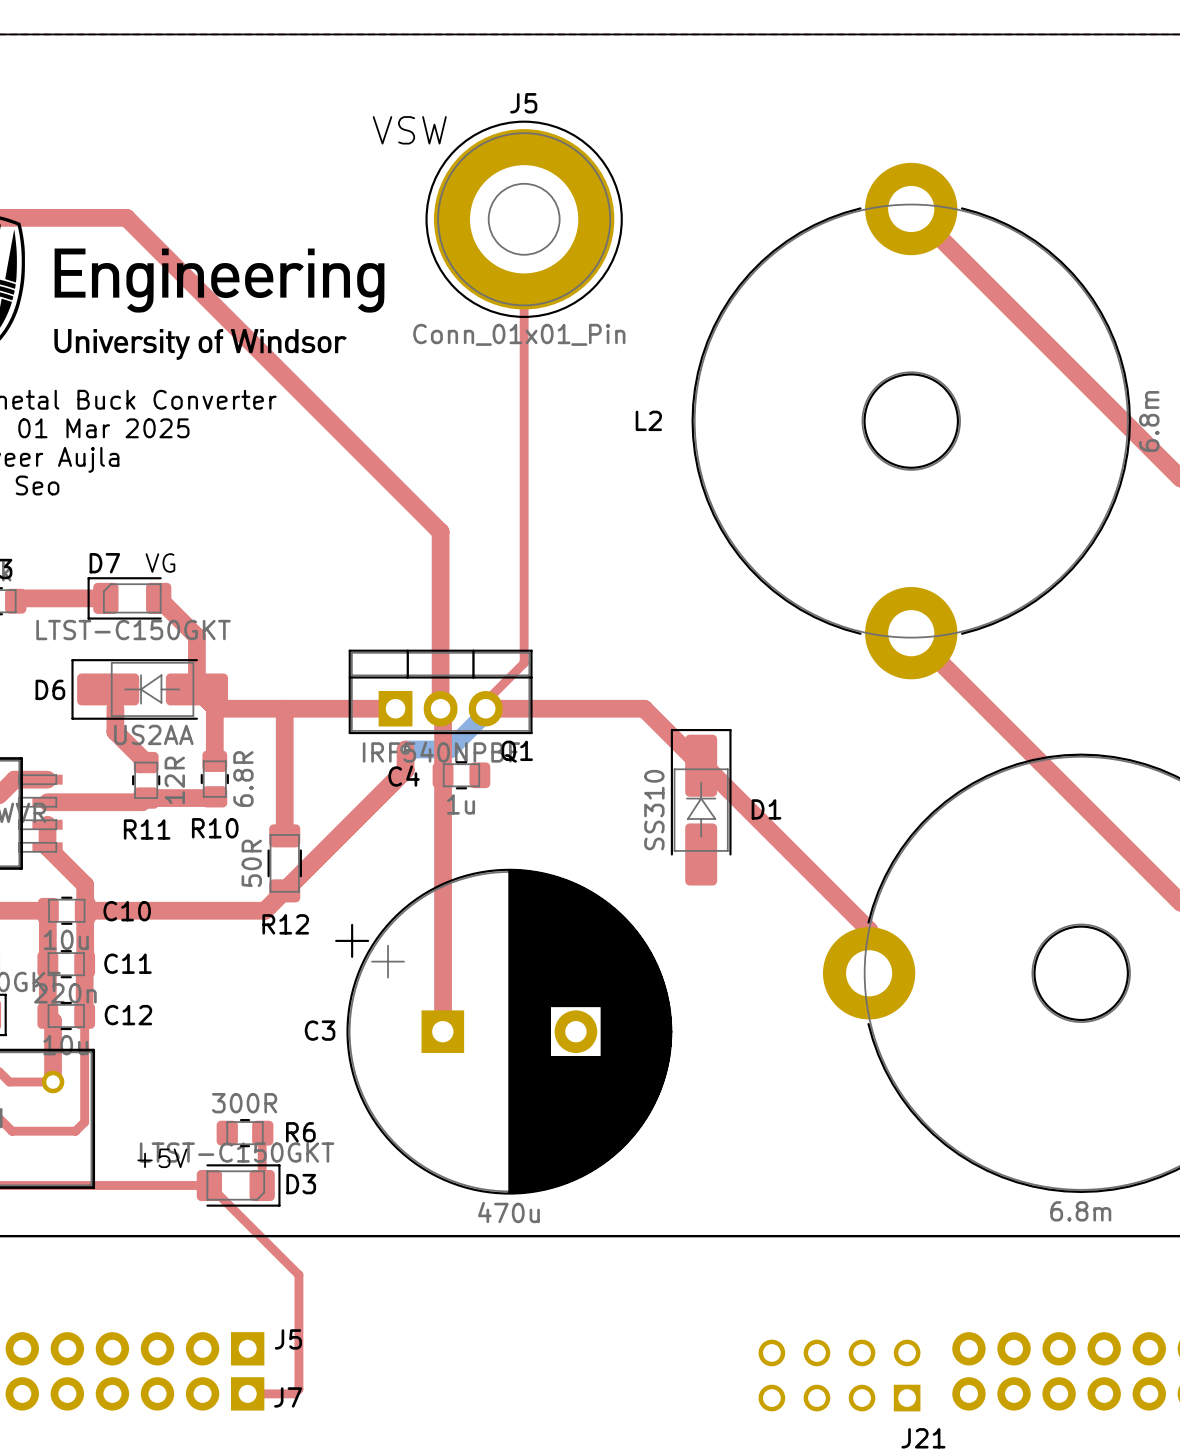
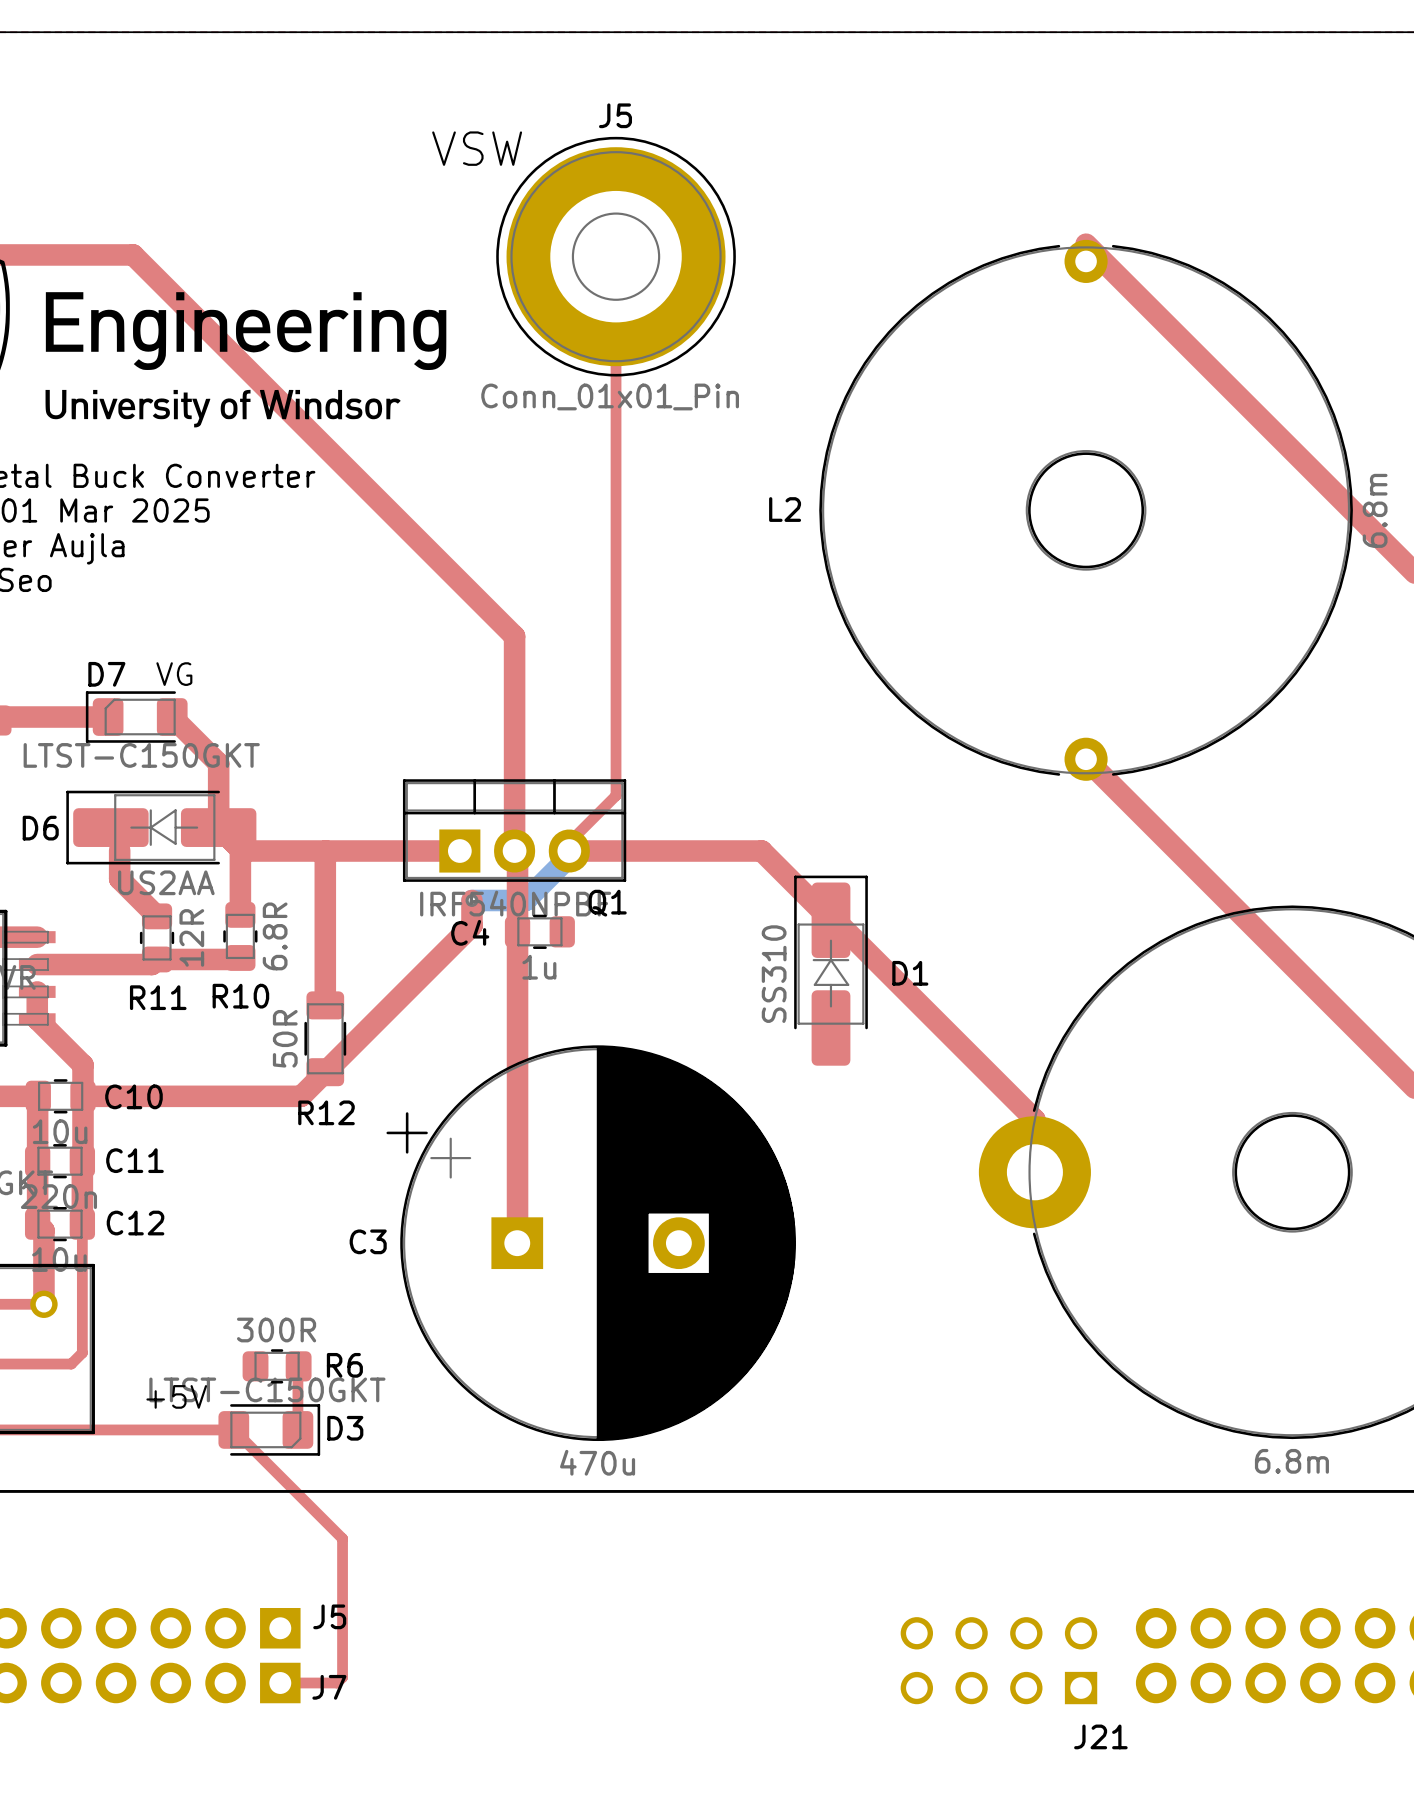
L2 footprint: [691, 162, 1131, 680] -> [819, 239, 1353, 781]

